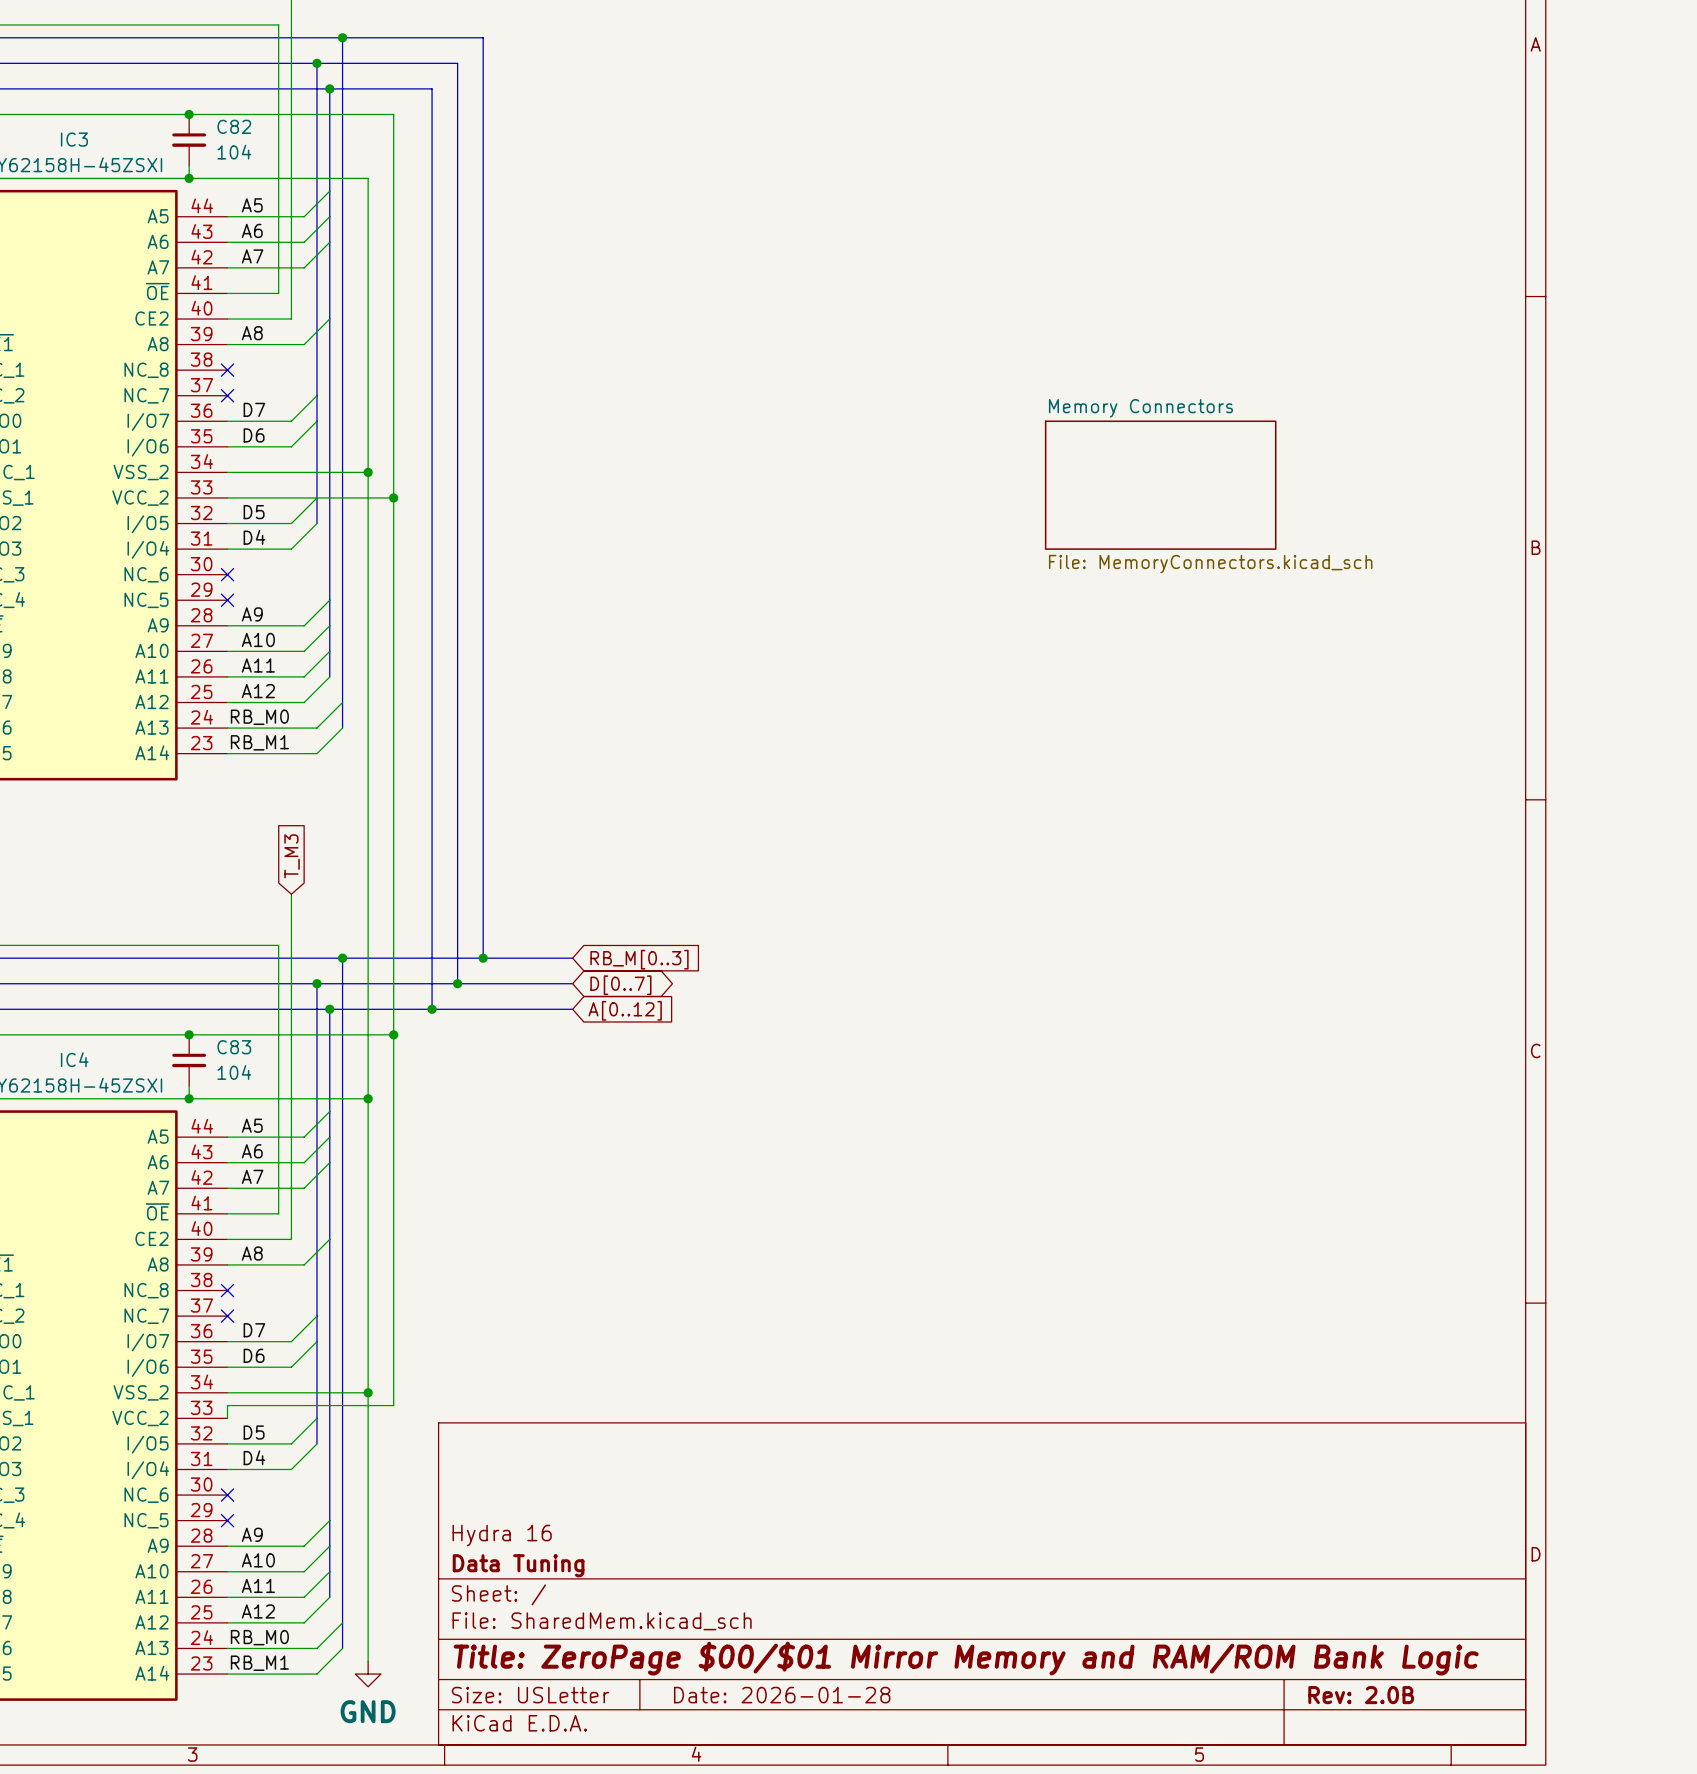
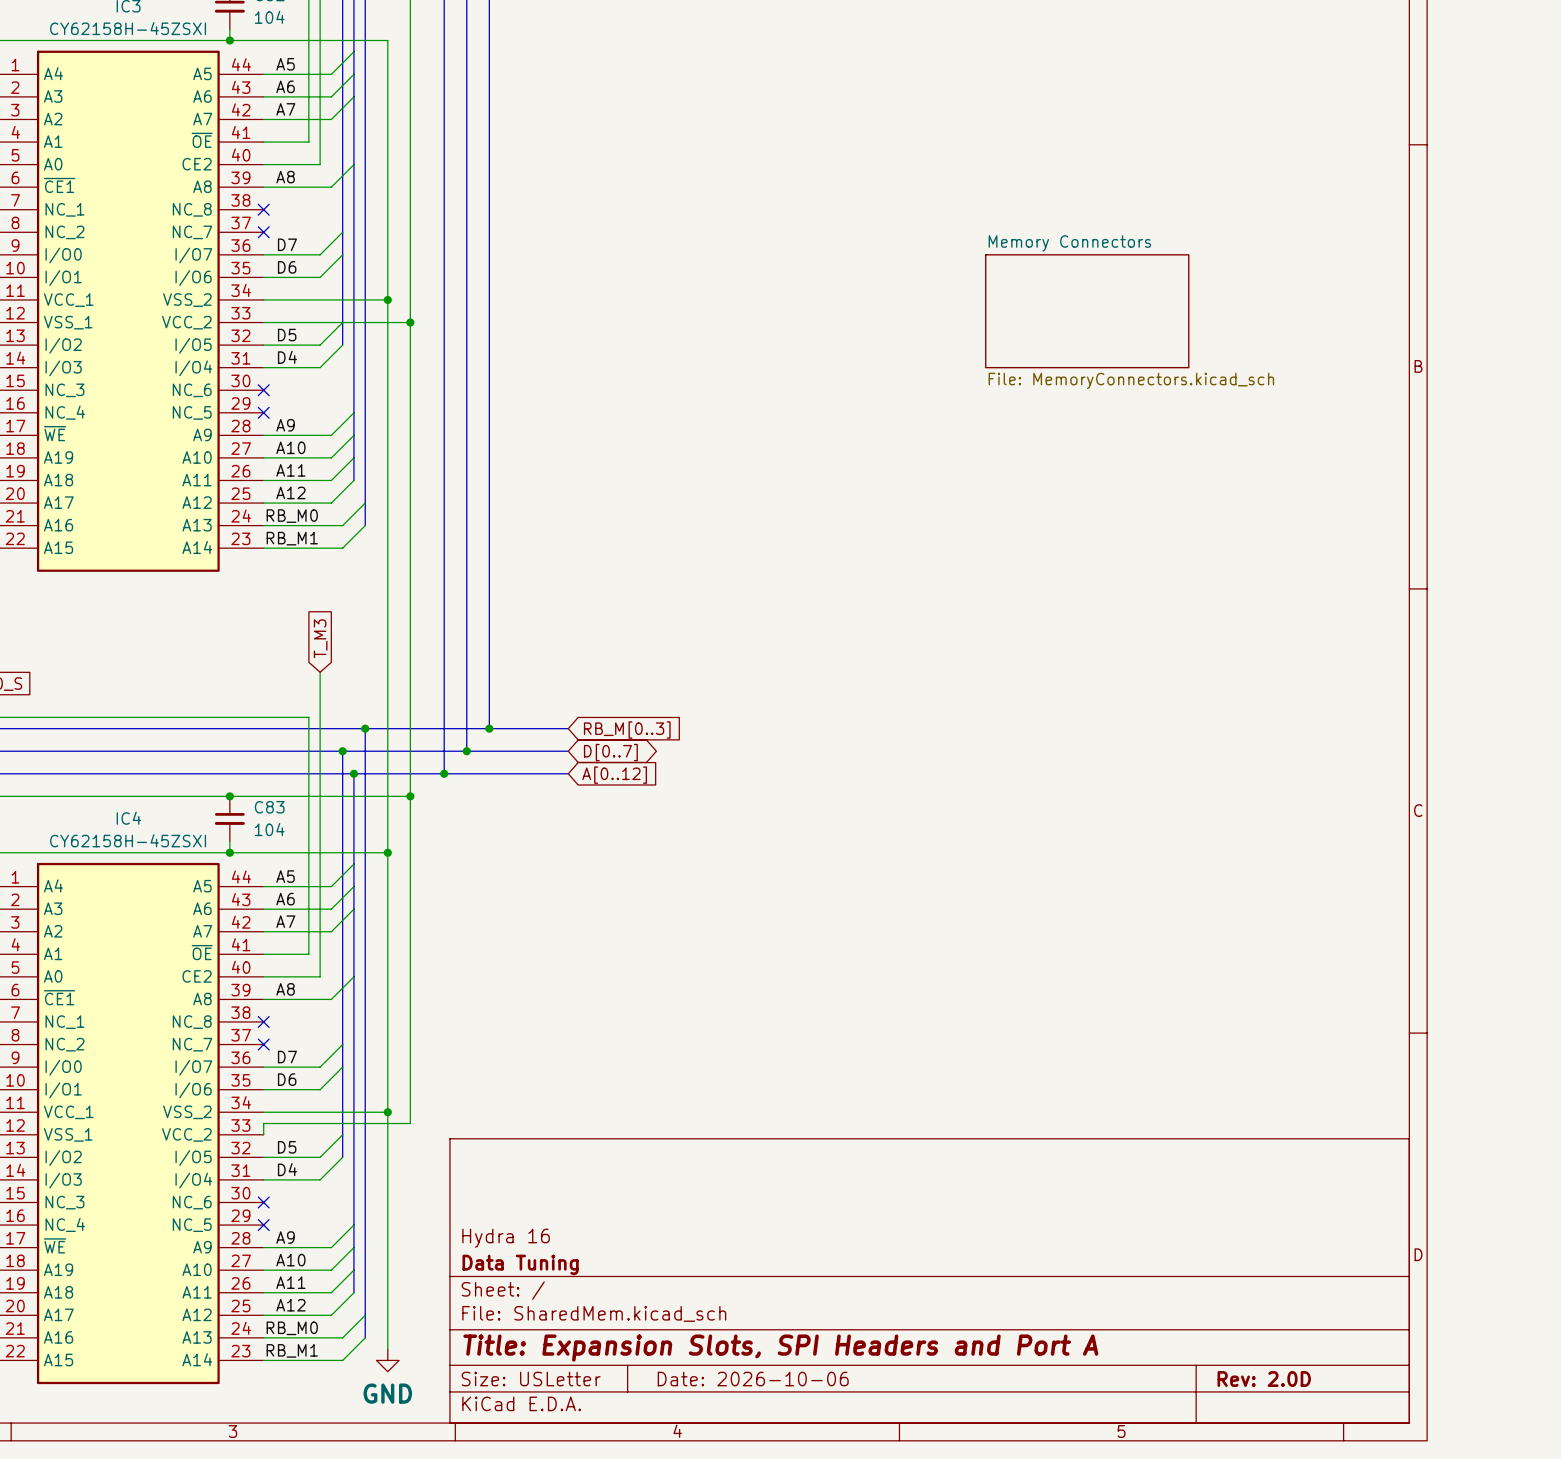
title block: Title: ZeroPage $00/$01 Mirror Memory and RAM/ROM Bank Logic (966, 1658) -> Title: Expansion Slots, SPI Headers and Port A (780, 1348)
title block: Date: 2026-01-28 (782, 1695) -> Date: 2026-10-06 (753, 1379)
title block: Rev: 2.0B (1361, 1695) -> Rev: 2.0D (1264, 1379)

